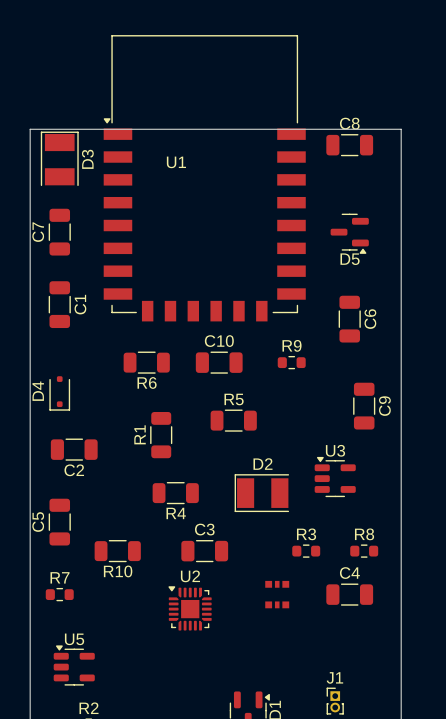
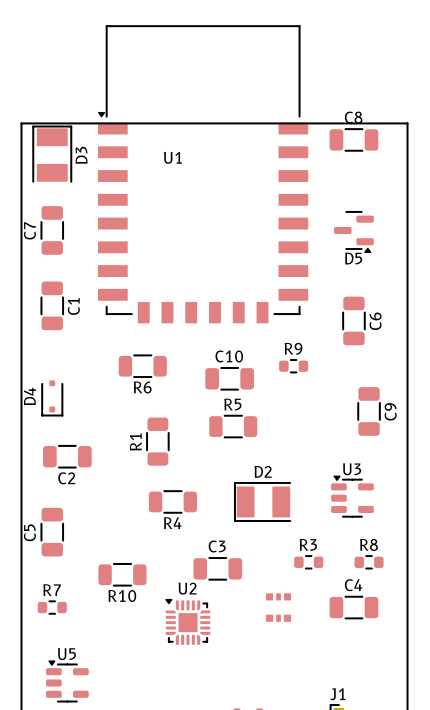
C10 position: (219, 362) -> (229, 378)
U3 position: (335, 477) -> (352, 496)
R10 position: (117, 551) -> (122, 574)
C3 position: (204, 551) -> (217, 568)

